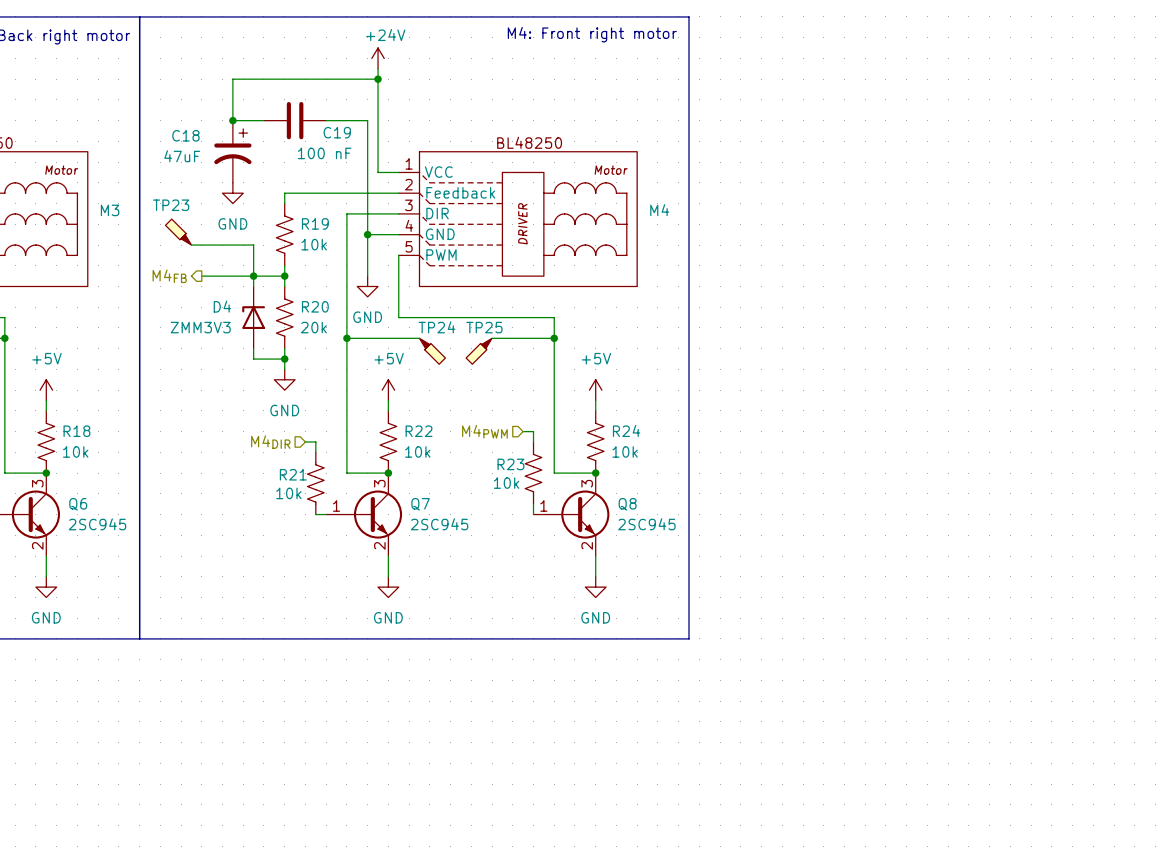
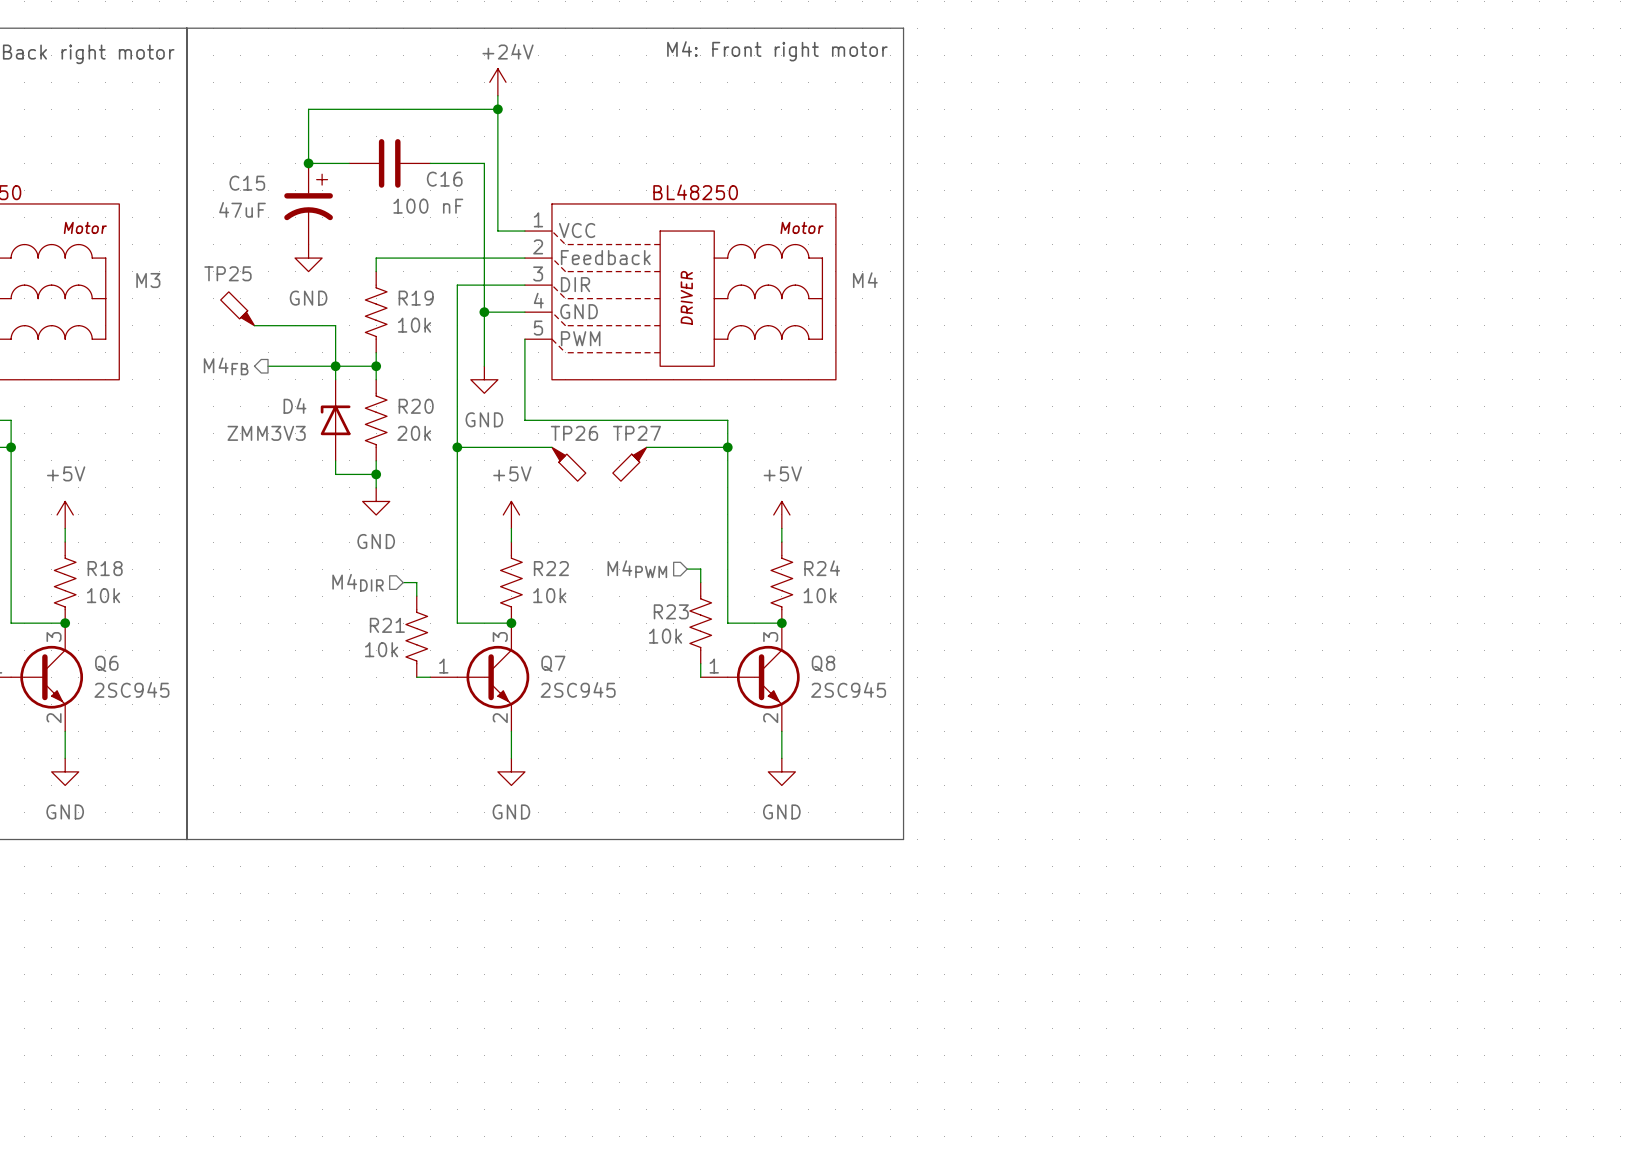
C19 name: C19 (337, 132) -> C16 (444, 179)
C18 name: C18 (185, 135) -> C15 (247, 183)
TP23 name: TP23 (171, 205) -> TP25 (227, 273)
TP24 name: TP24 (436, 327) -> TP26 (574, 433)
TP25 name: TP25 (484, 327) -> TP27 (637, 433)

